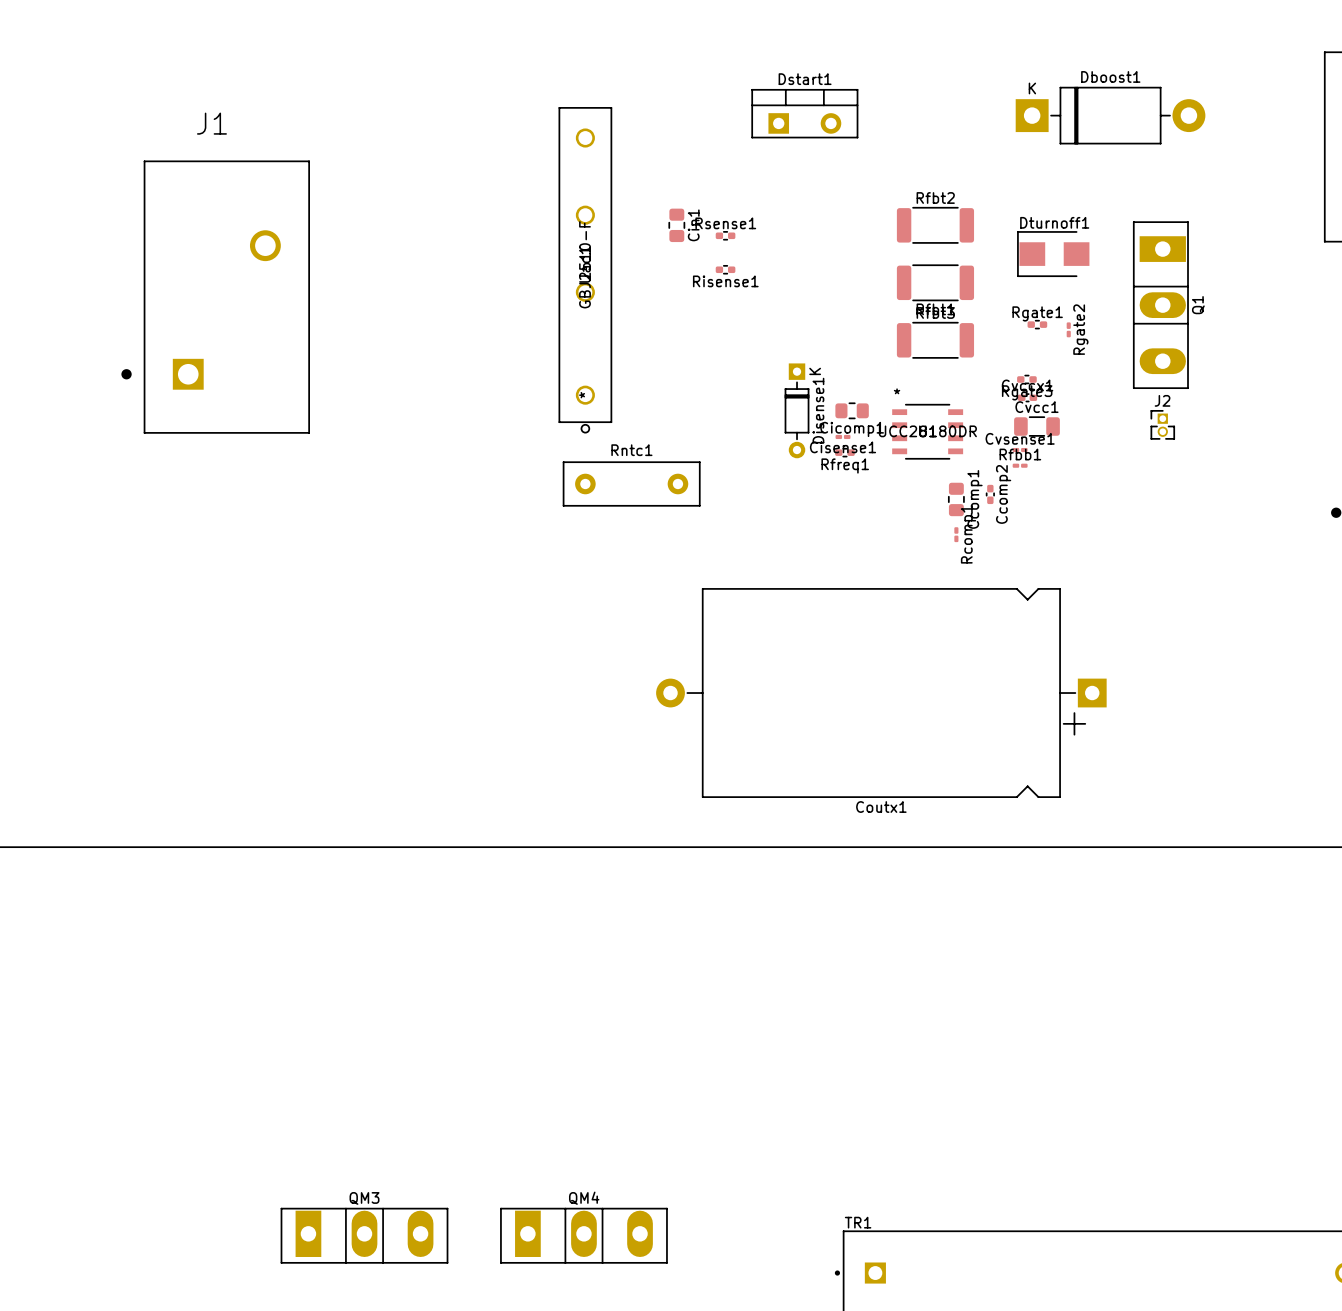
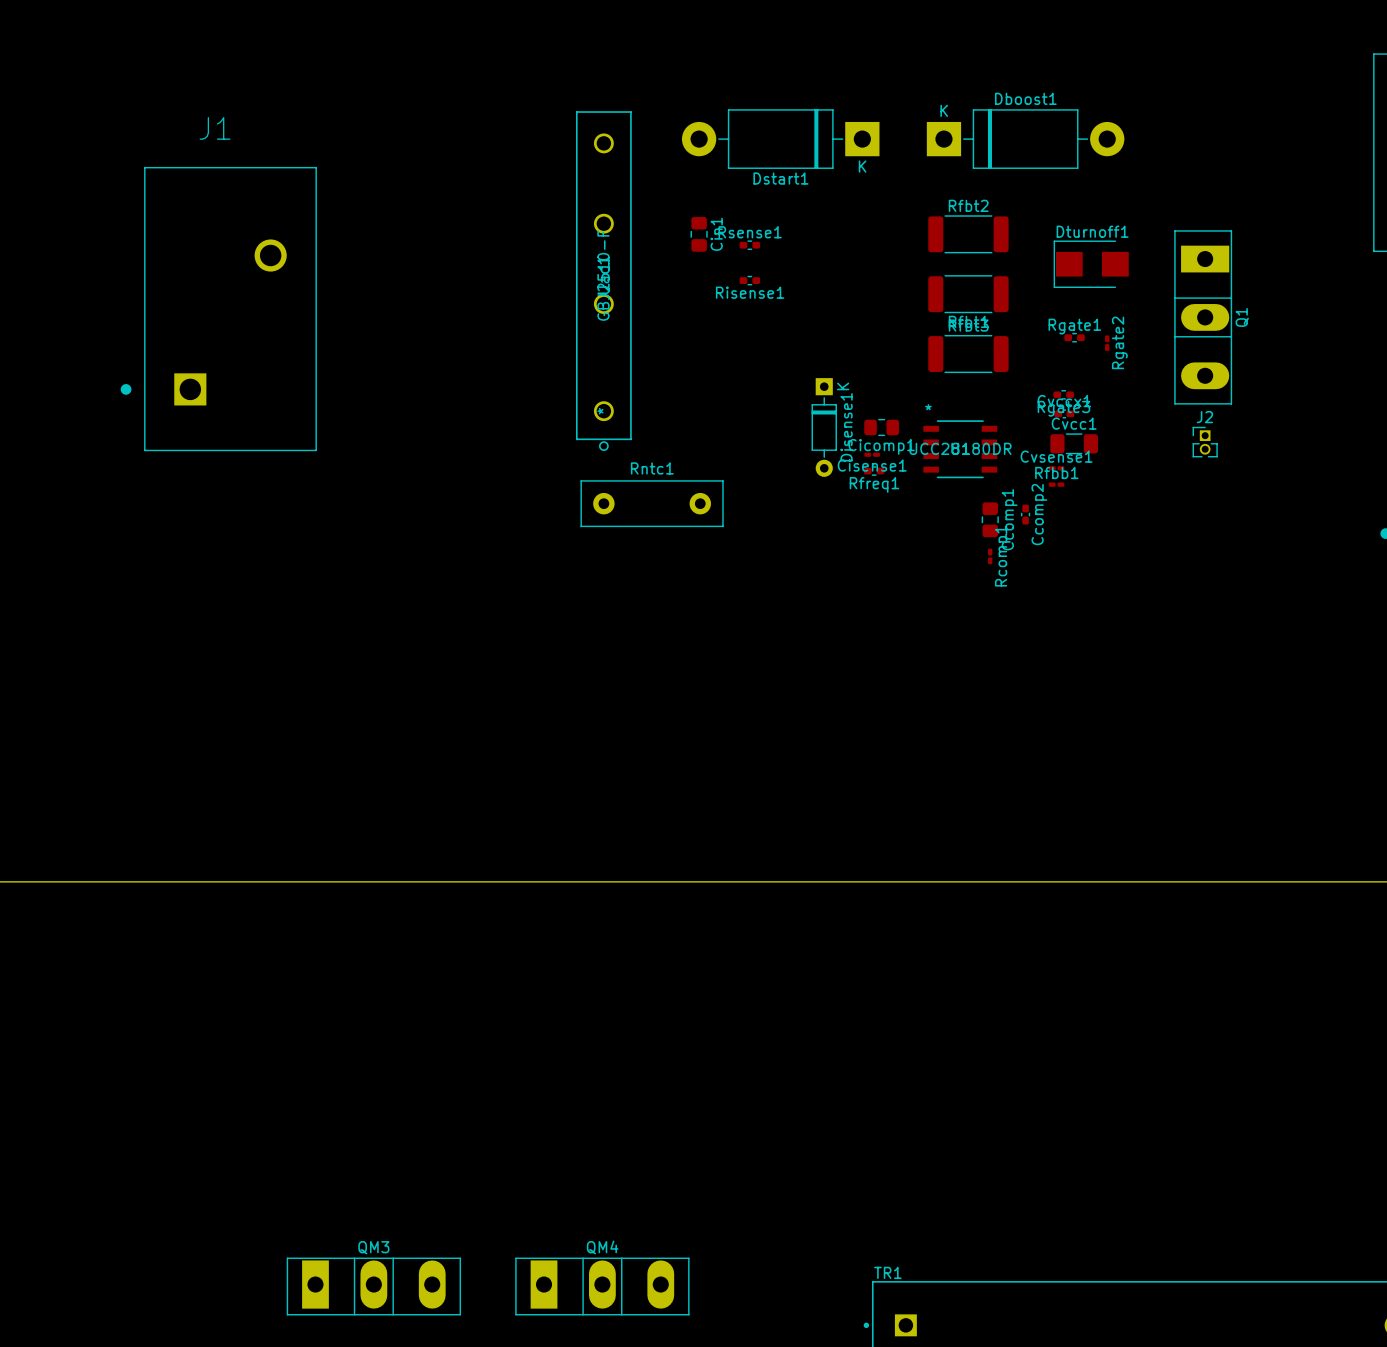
Dstart1 name position: Dstart1 (805, 79) -> Dstart1 (780, 178)
Dstart1 footprint: [751, 89, 859, 139] -> [681, 109, 880, 169]
Dboost1 position: (1110, 115) -> (1025, 139)
Coutx1: (881, 693) -> none

